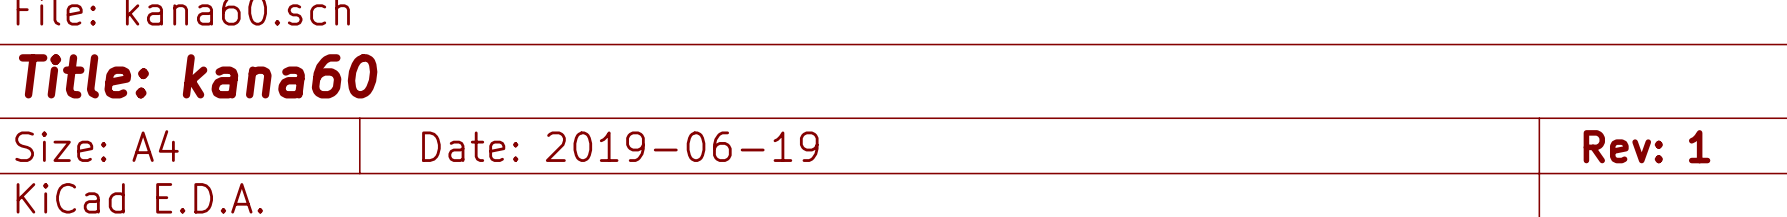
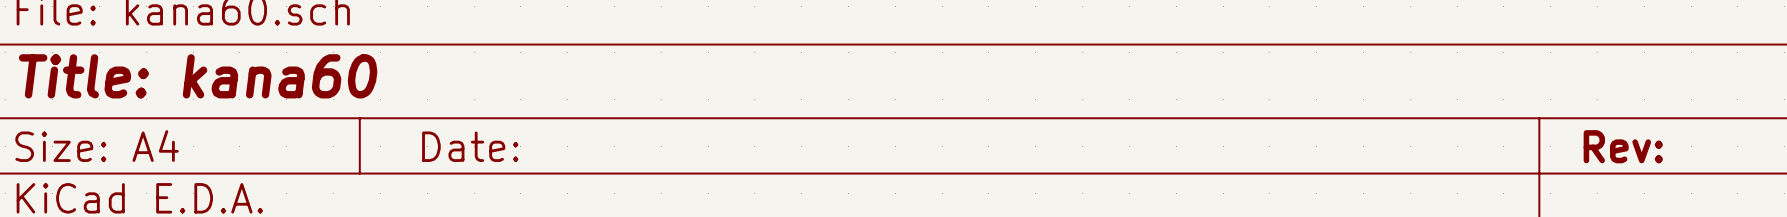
title block: Date: 2019-06-19 (620, 146) -> Date: (470, 146)
title block: Rev: 1 (1646, 146) -> Rev: (1623, 146)

